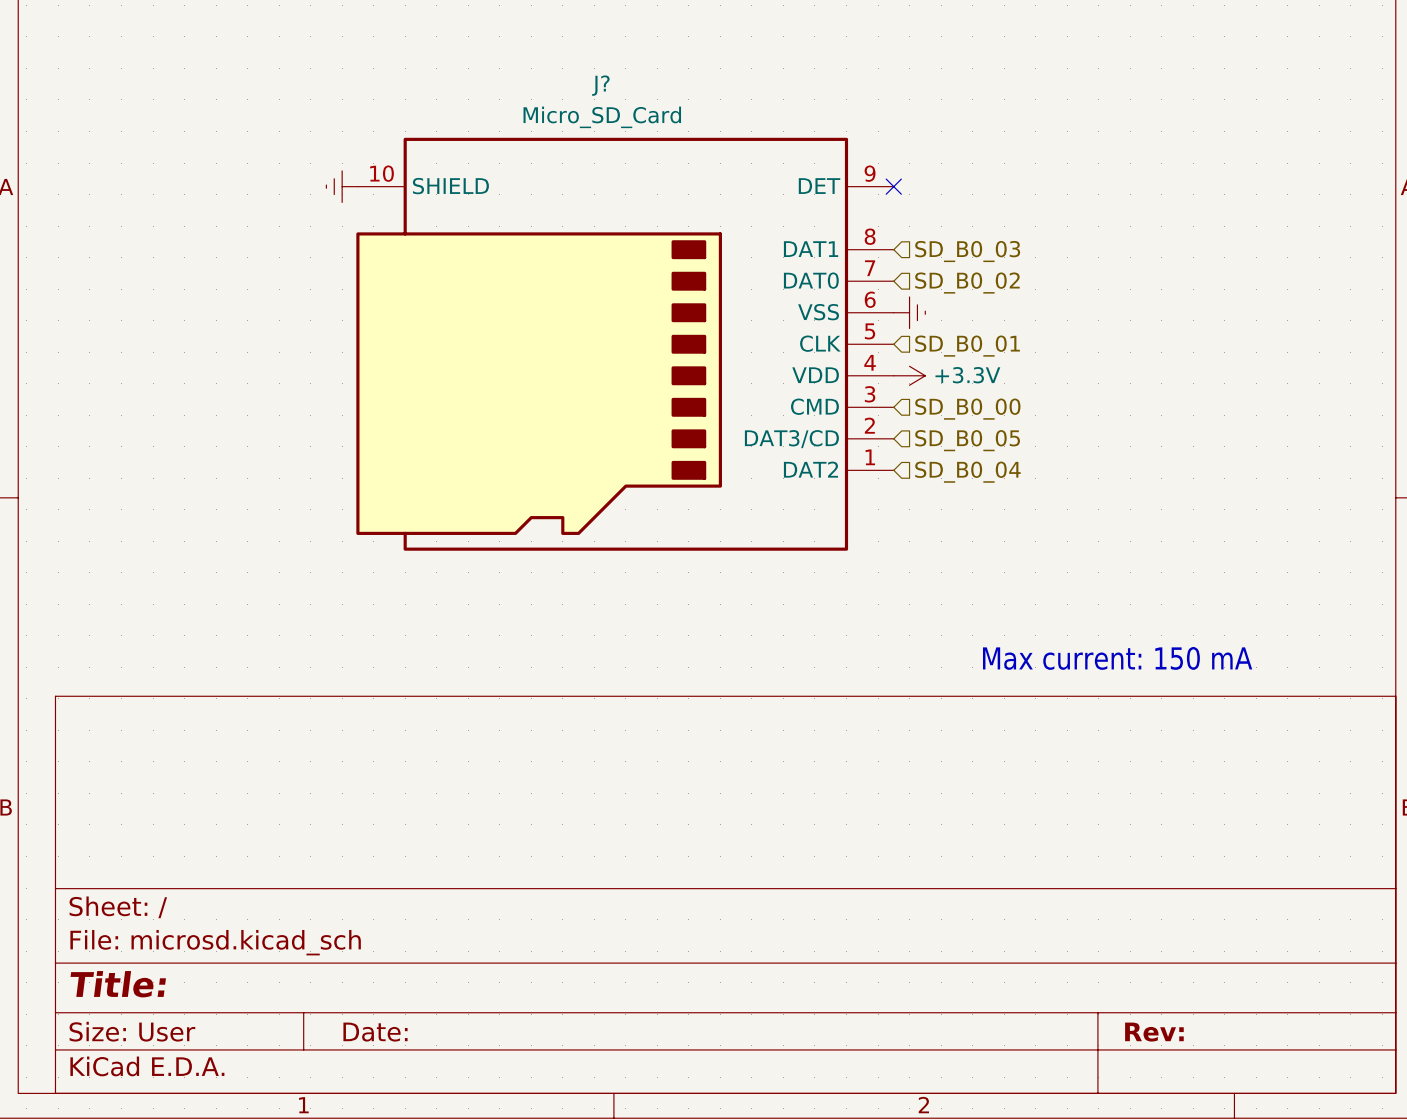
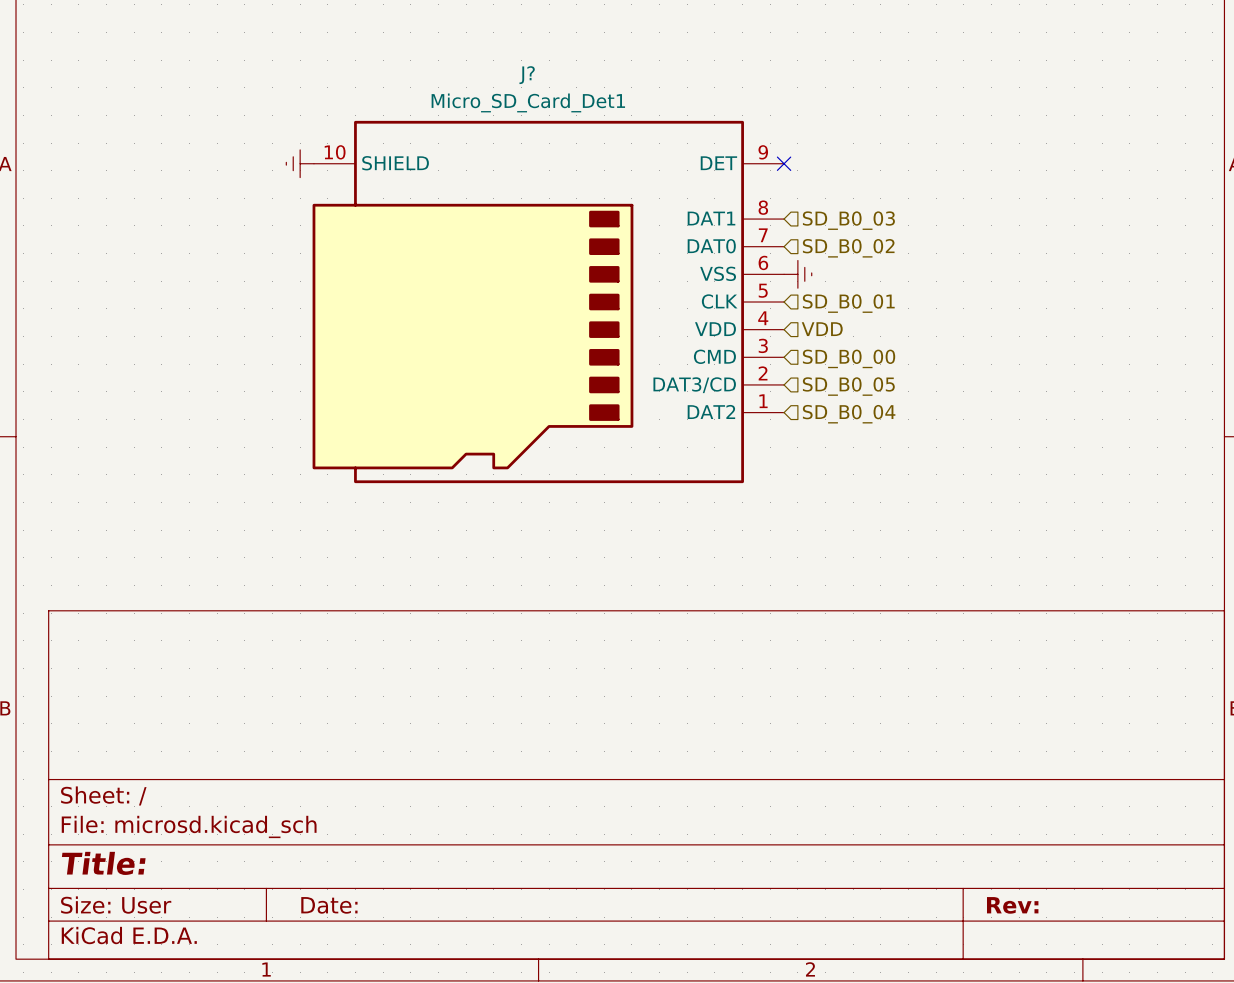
J? value: Micro_SD_Card (602, 117) -> Micro_SD_Card_Det1 (528, 102)
power symbol: +3.3V (909, 375) -> none
hierarchical label: none -> VDD (822, 329)
text: Max current: 150 mA (1117, 658) -> none

